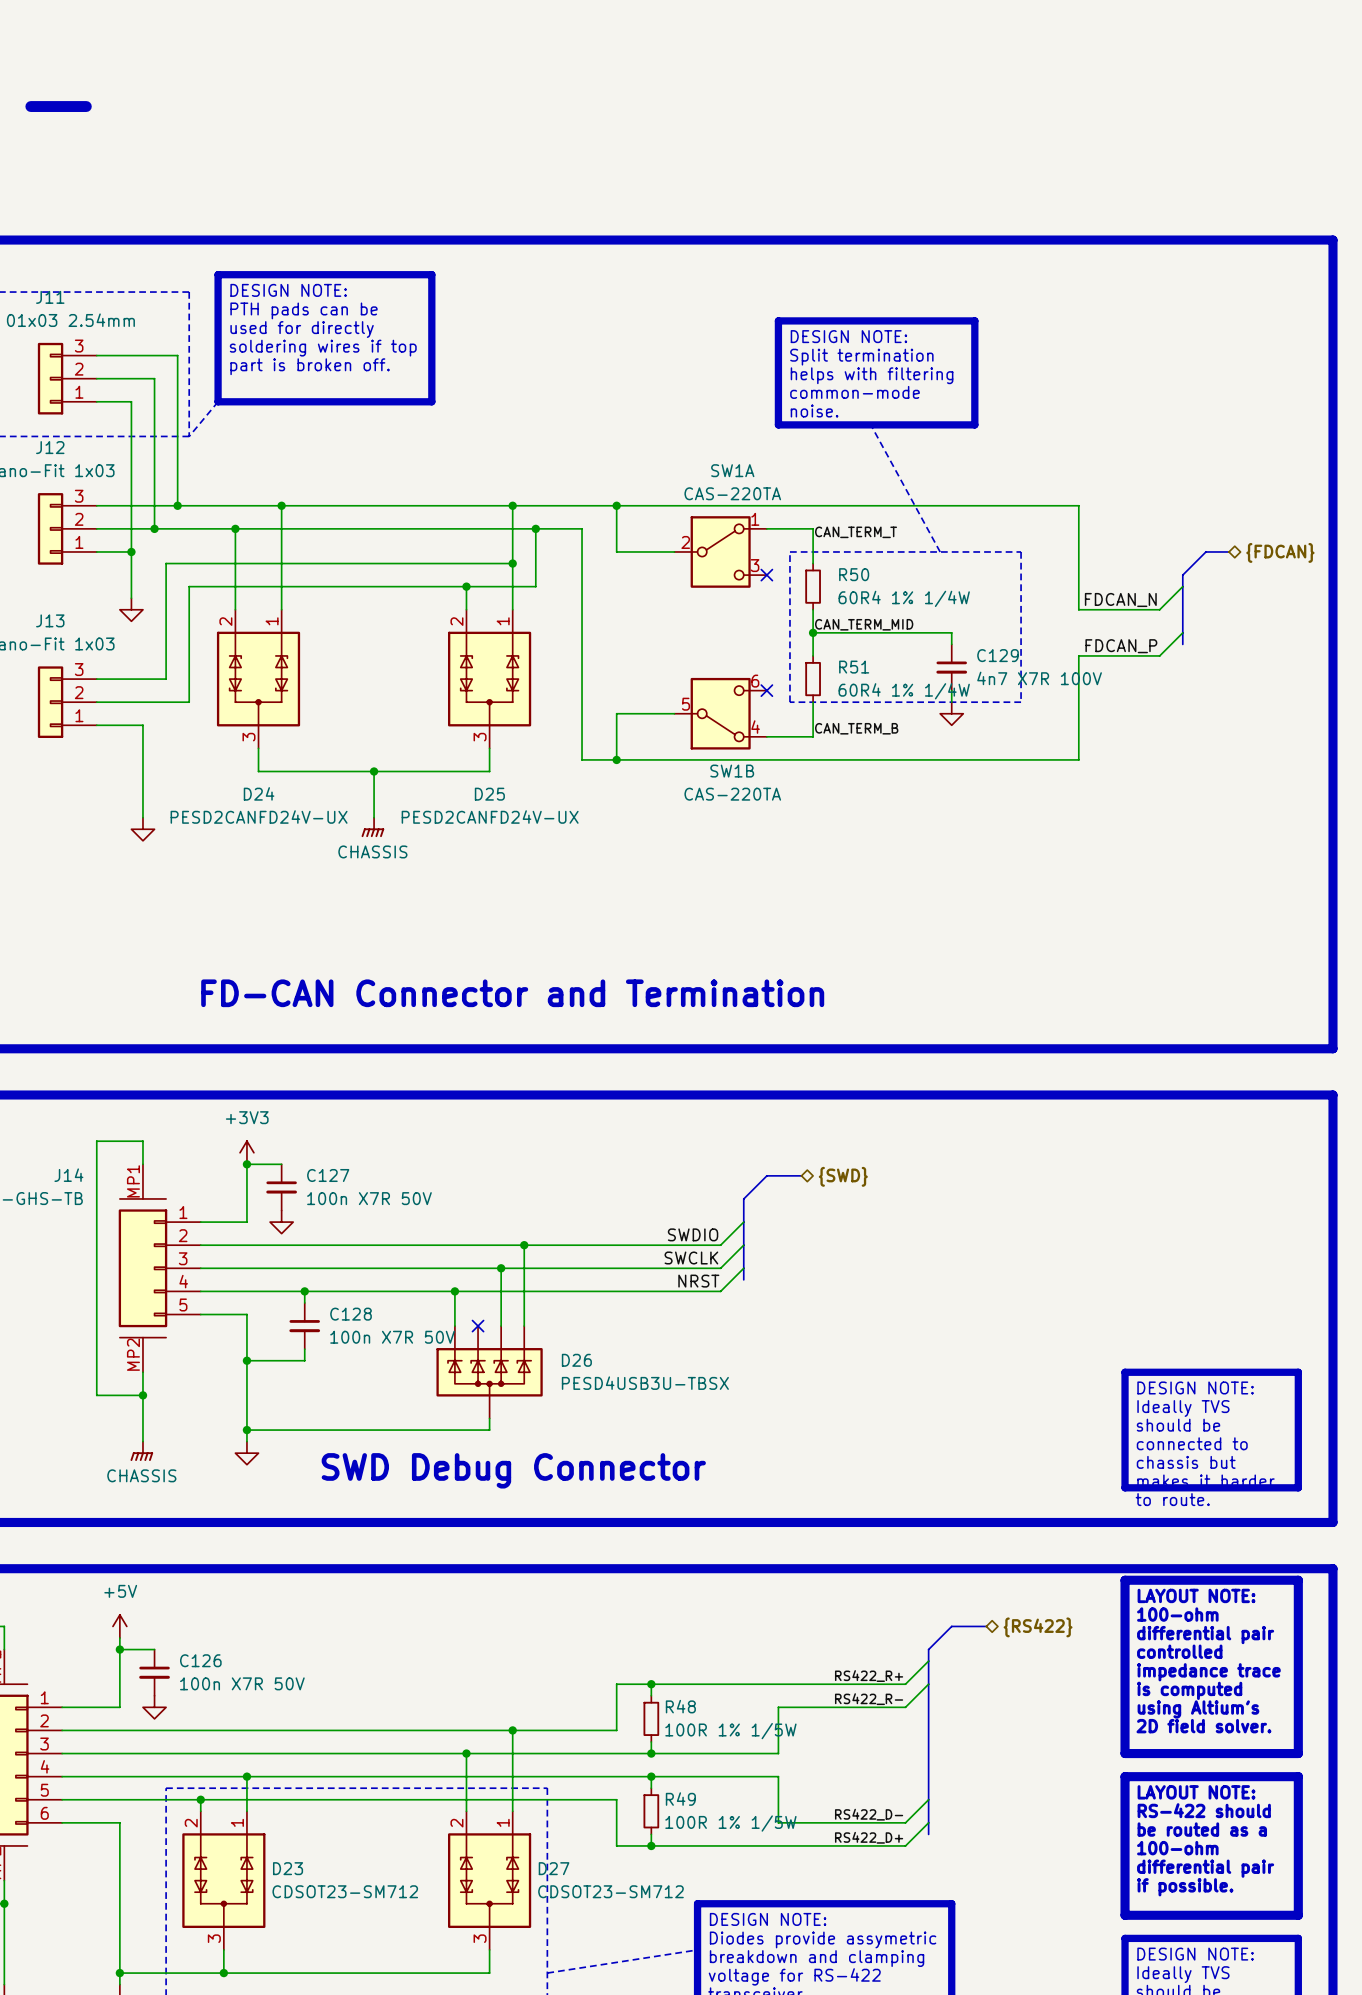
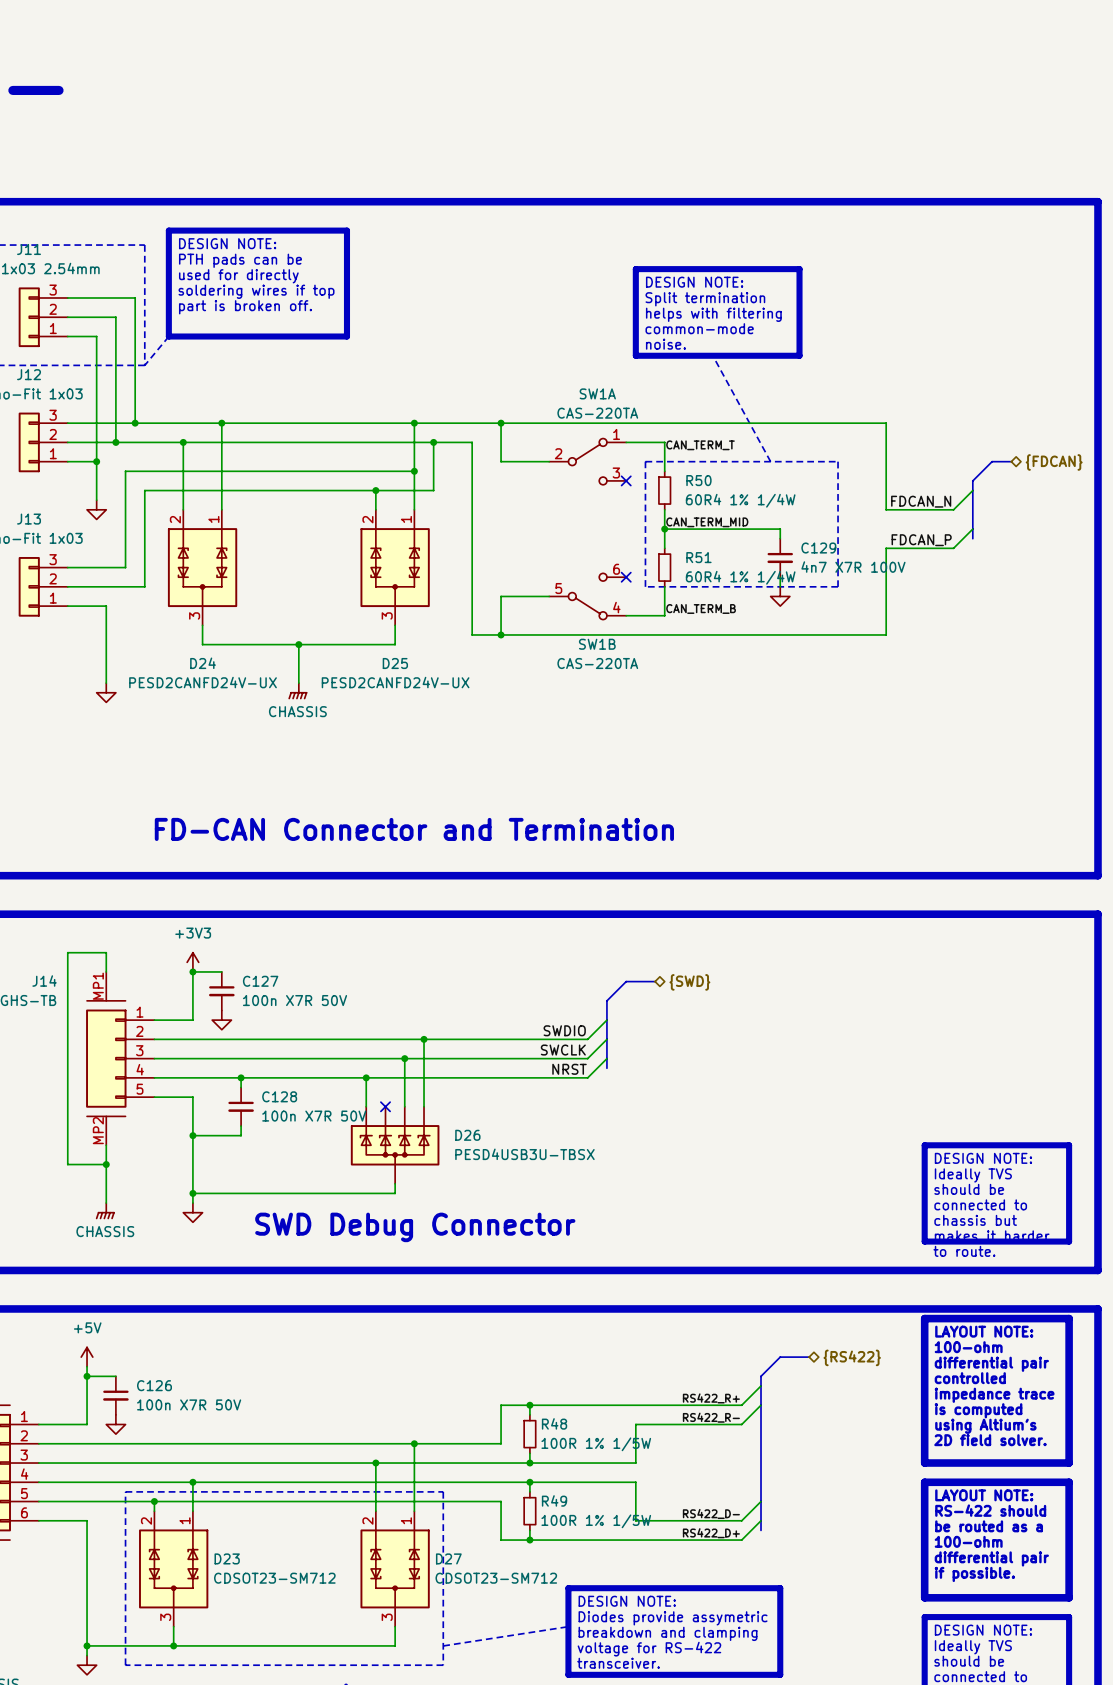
SW1A symbol: [674, 516, 767, 588] -> [549, 438, 627, 485]
SW1B symbol: [674, 677, 767, 750] -> [549, 573, 627, 620]

